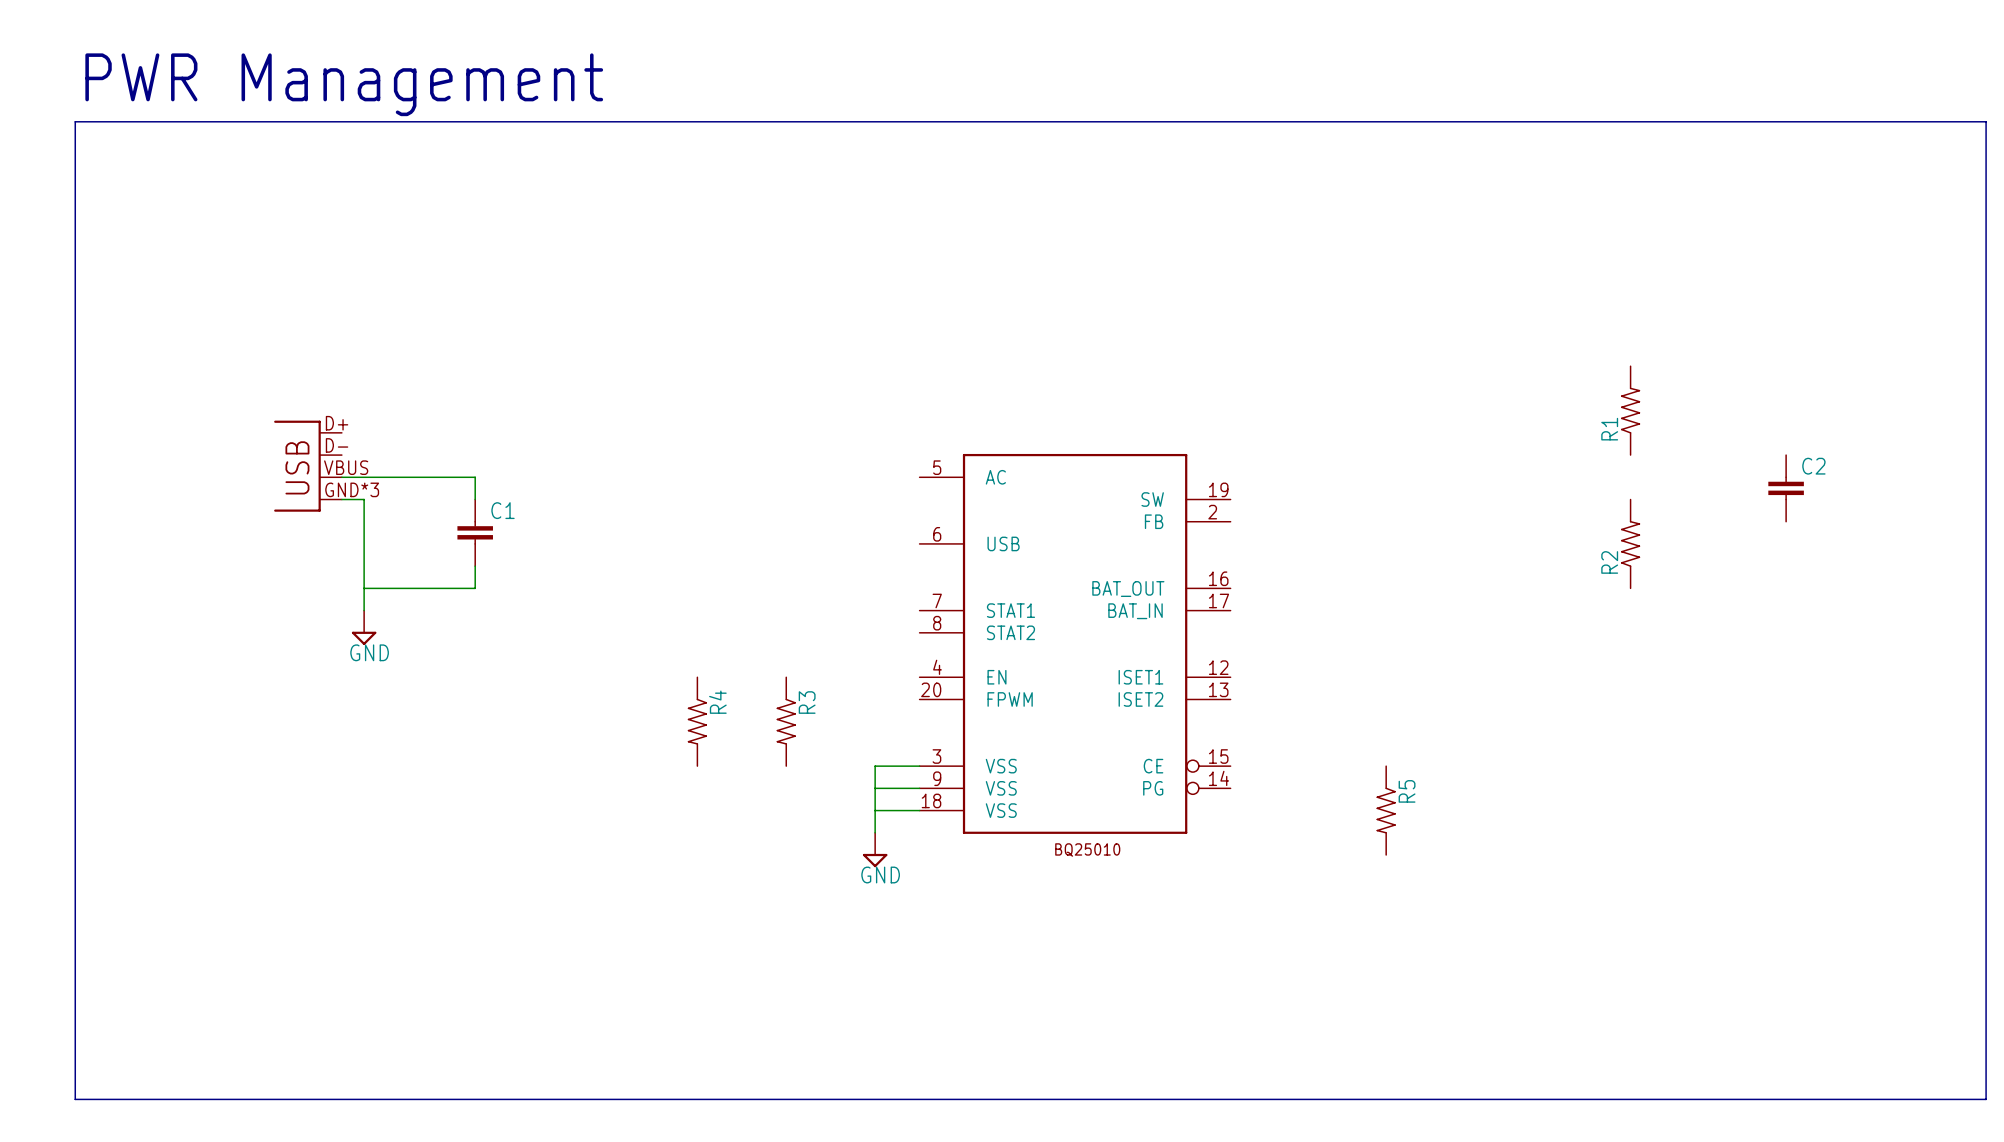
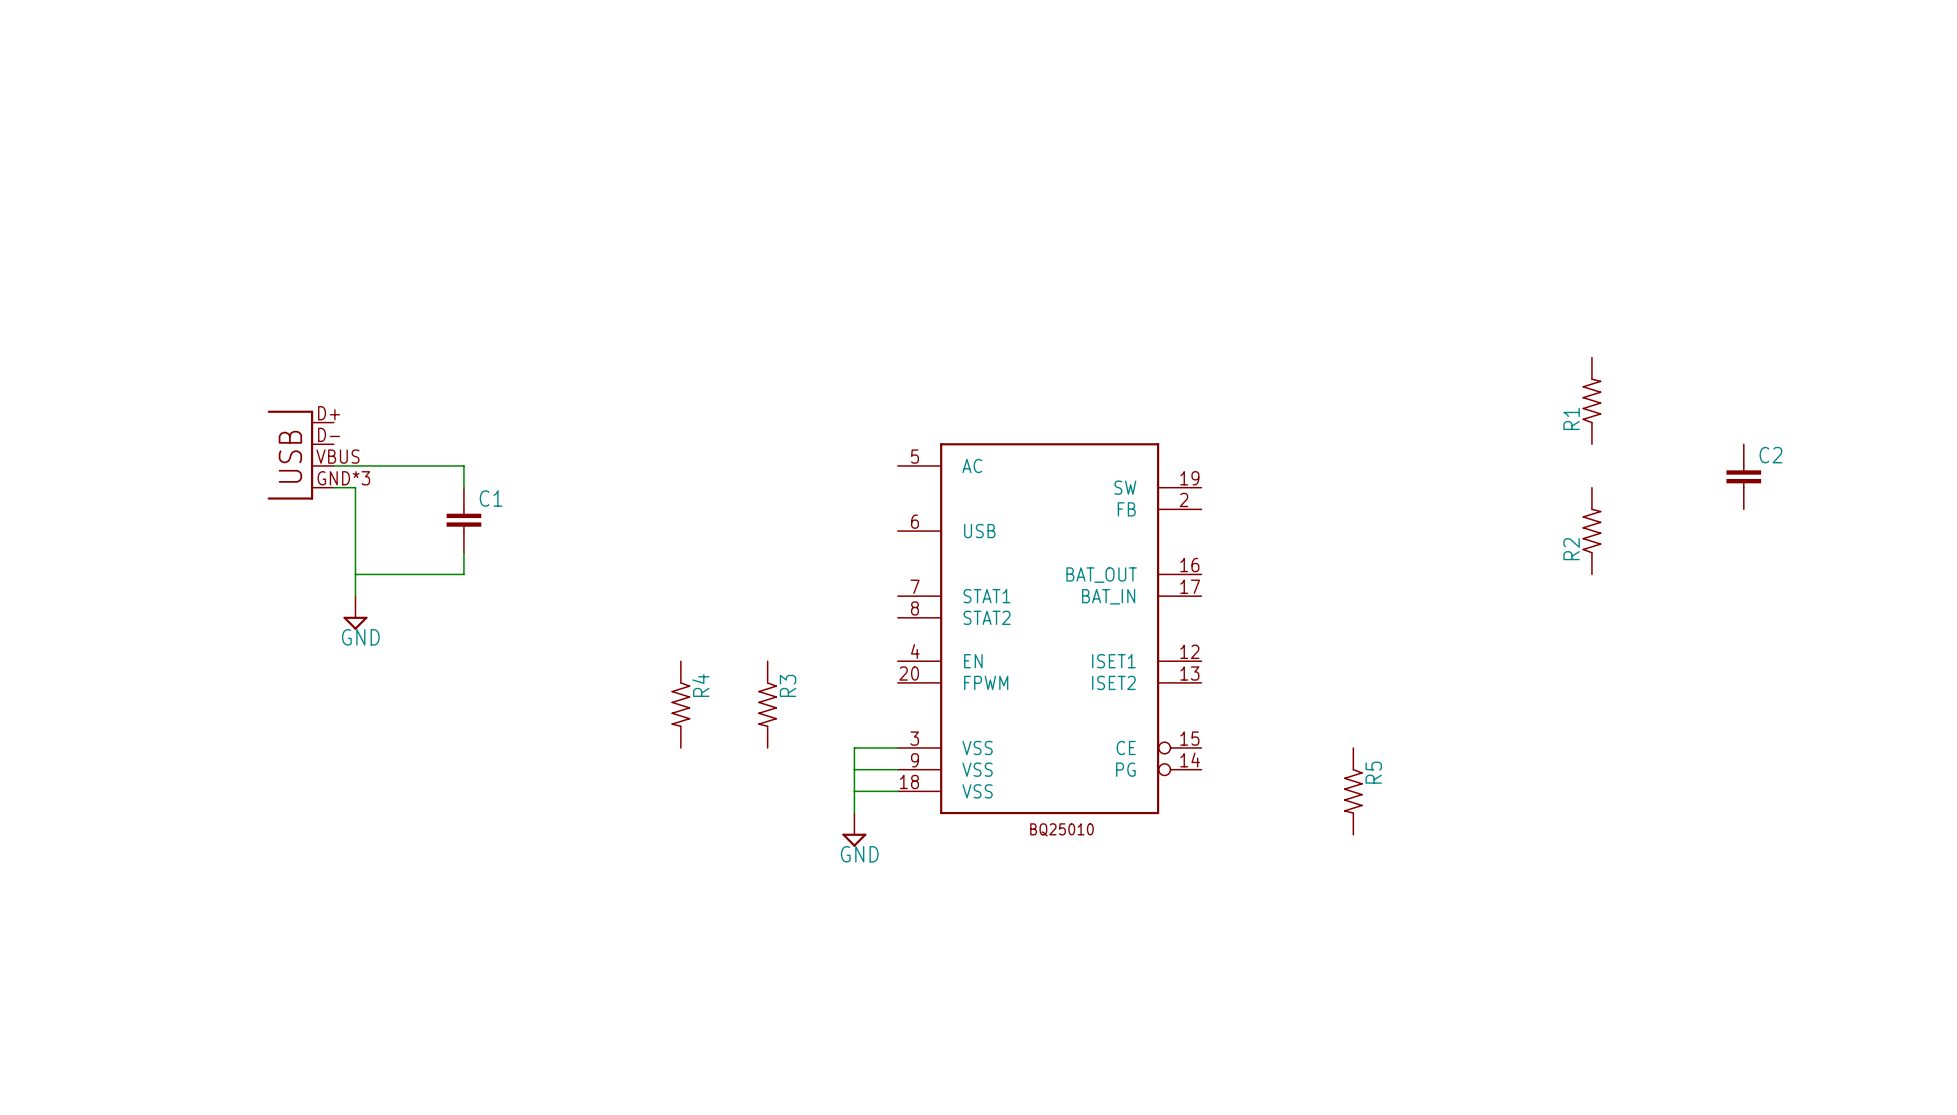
text: PWR Management (344, 84) -> none
line: (75, 121) (75, 1099) (1986, 1099) (1986, 121) (75, 121) -> none

